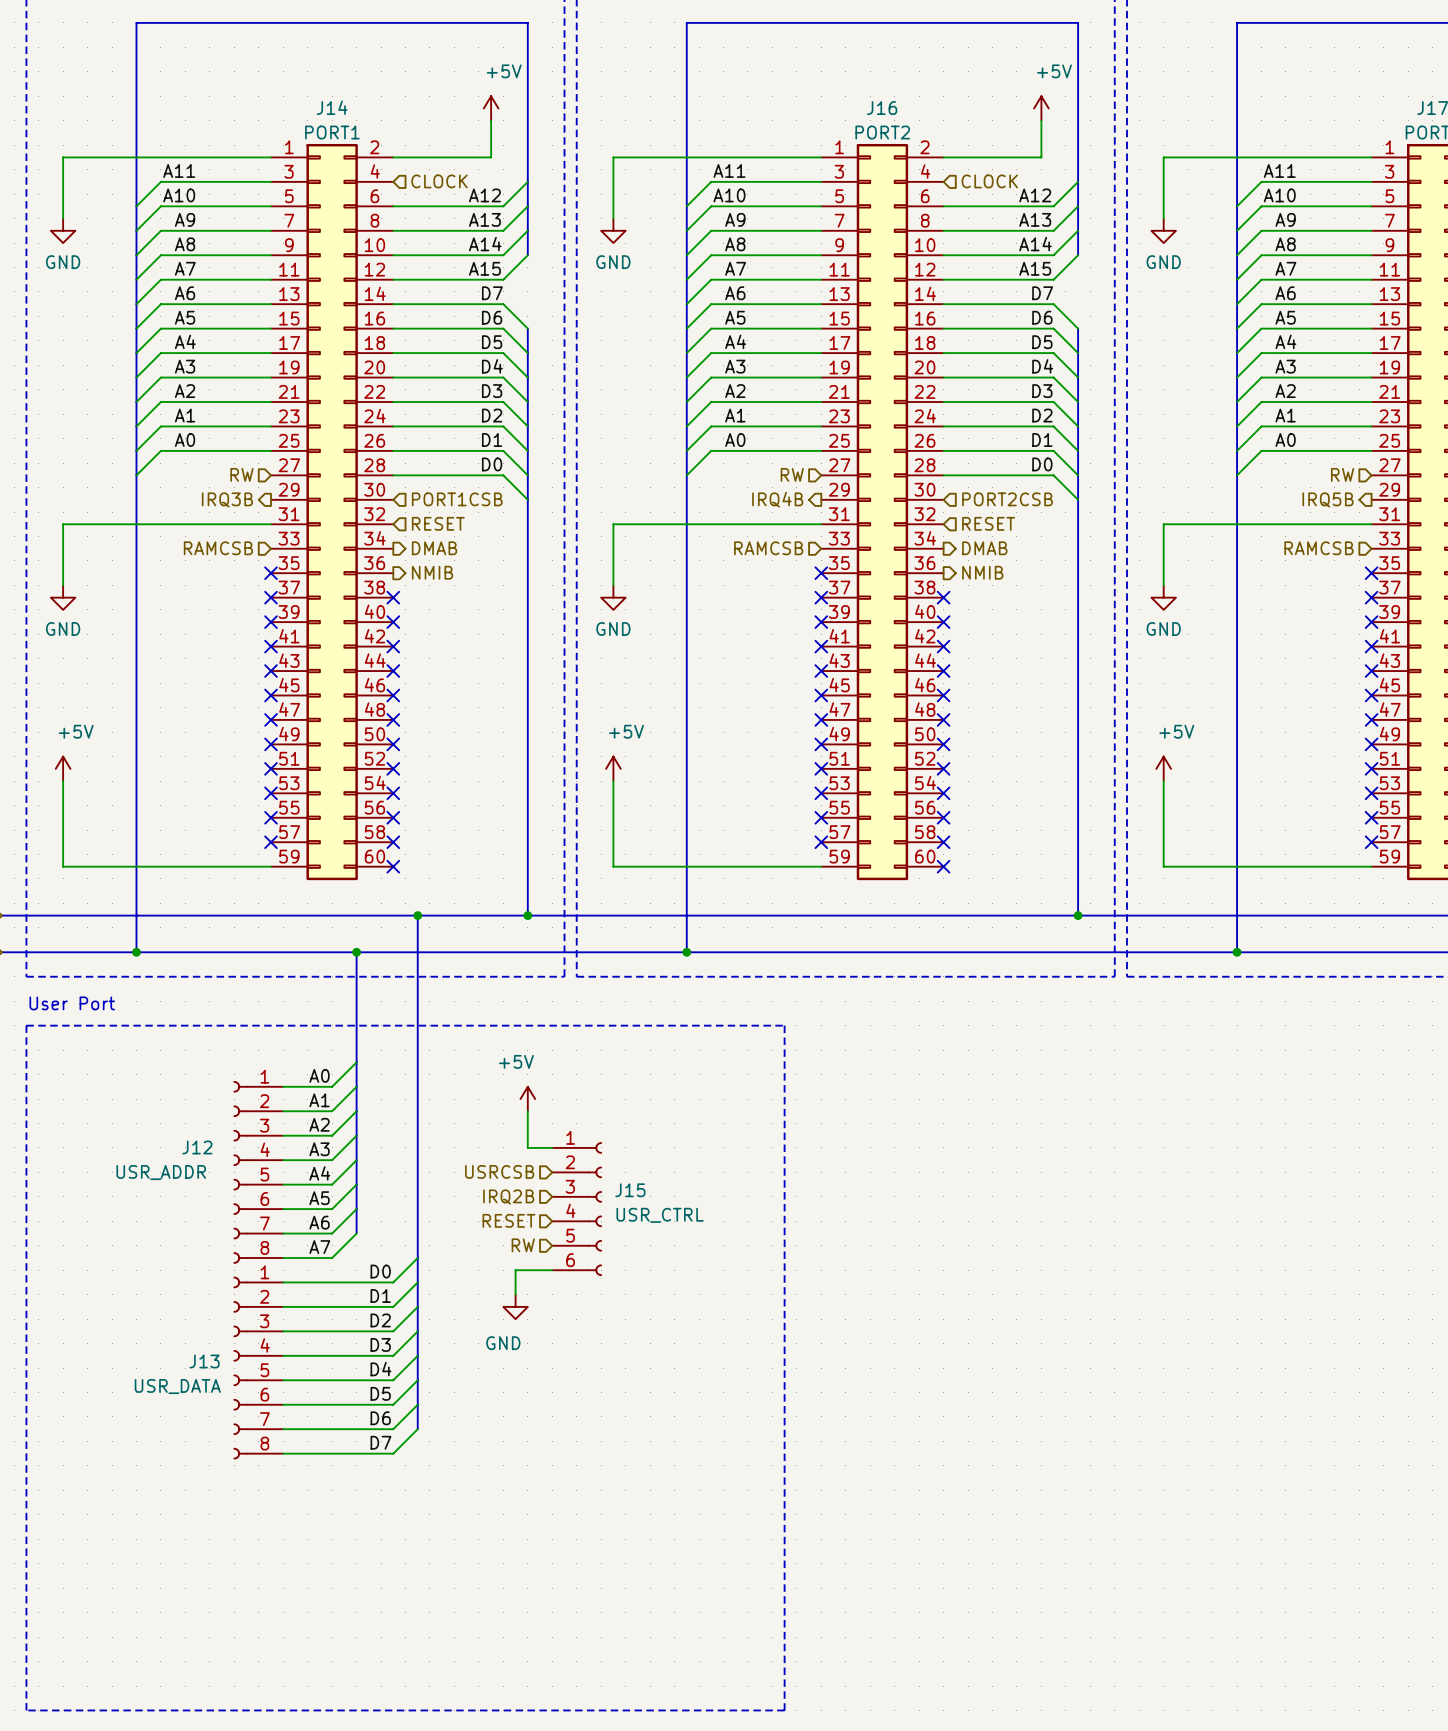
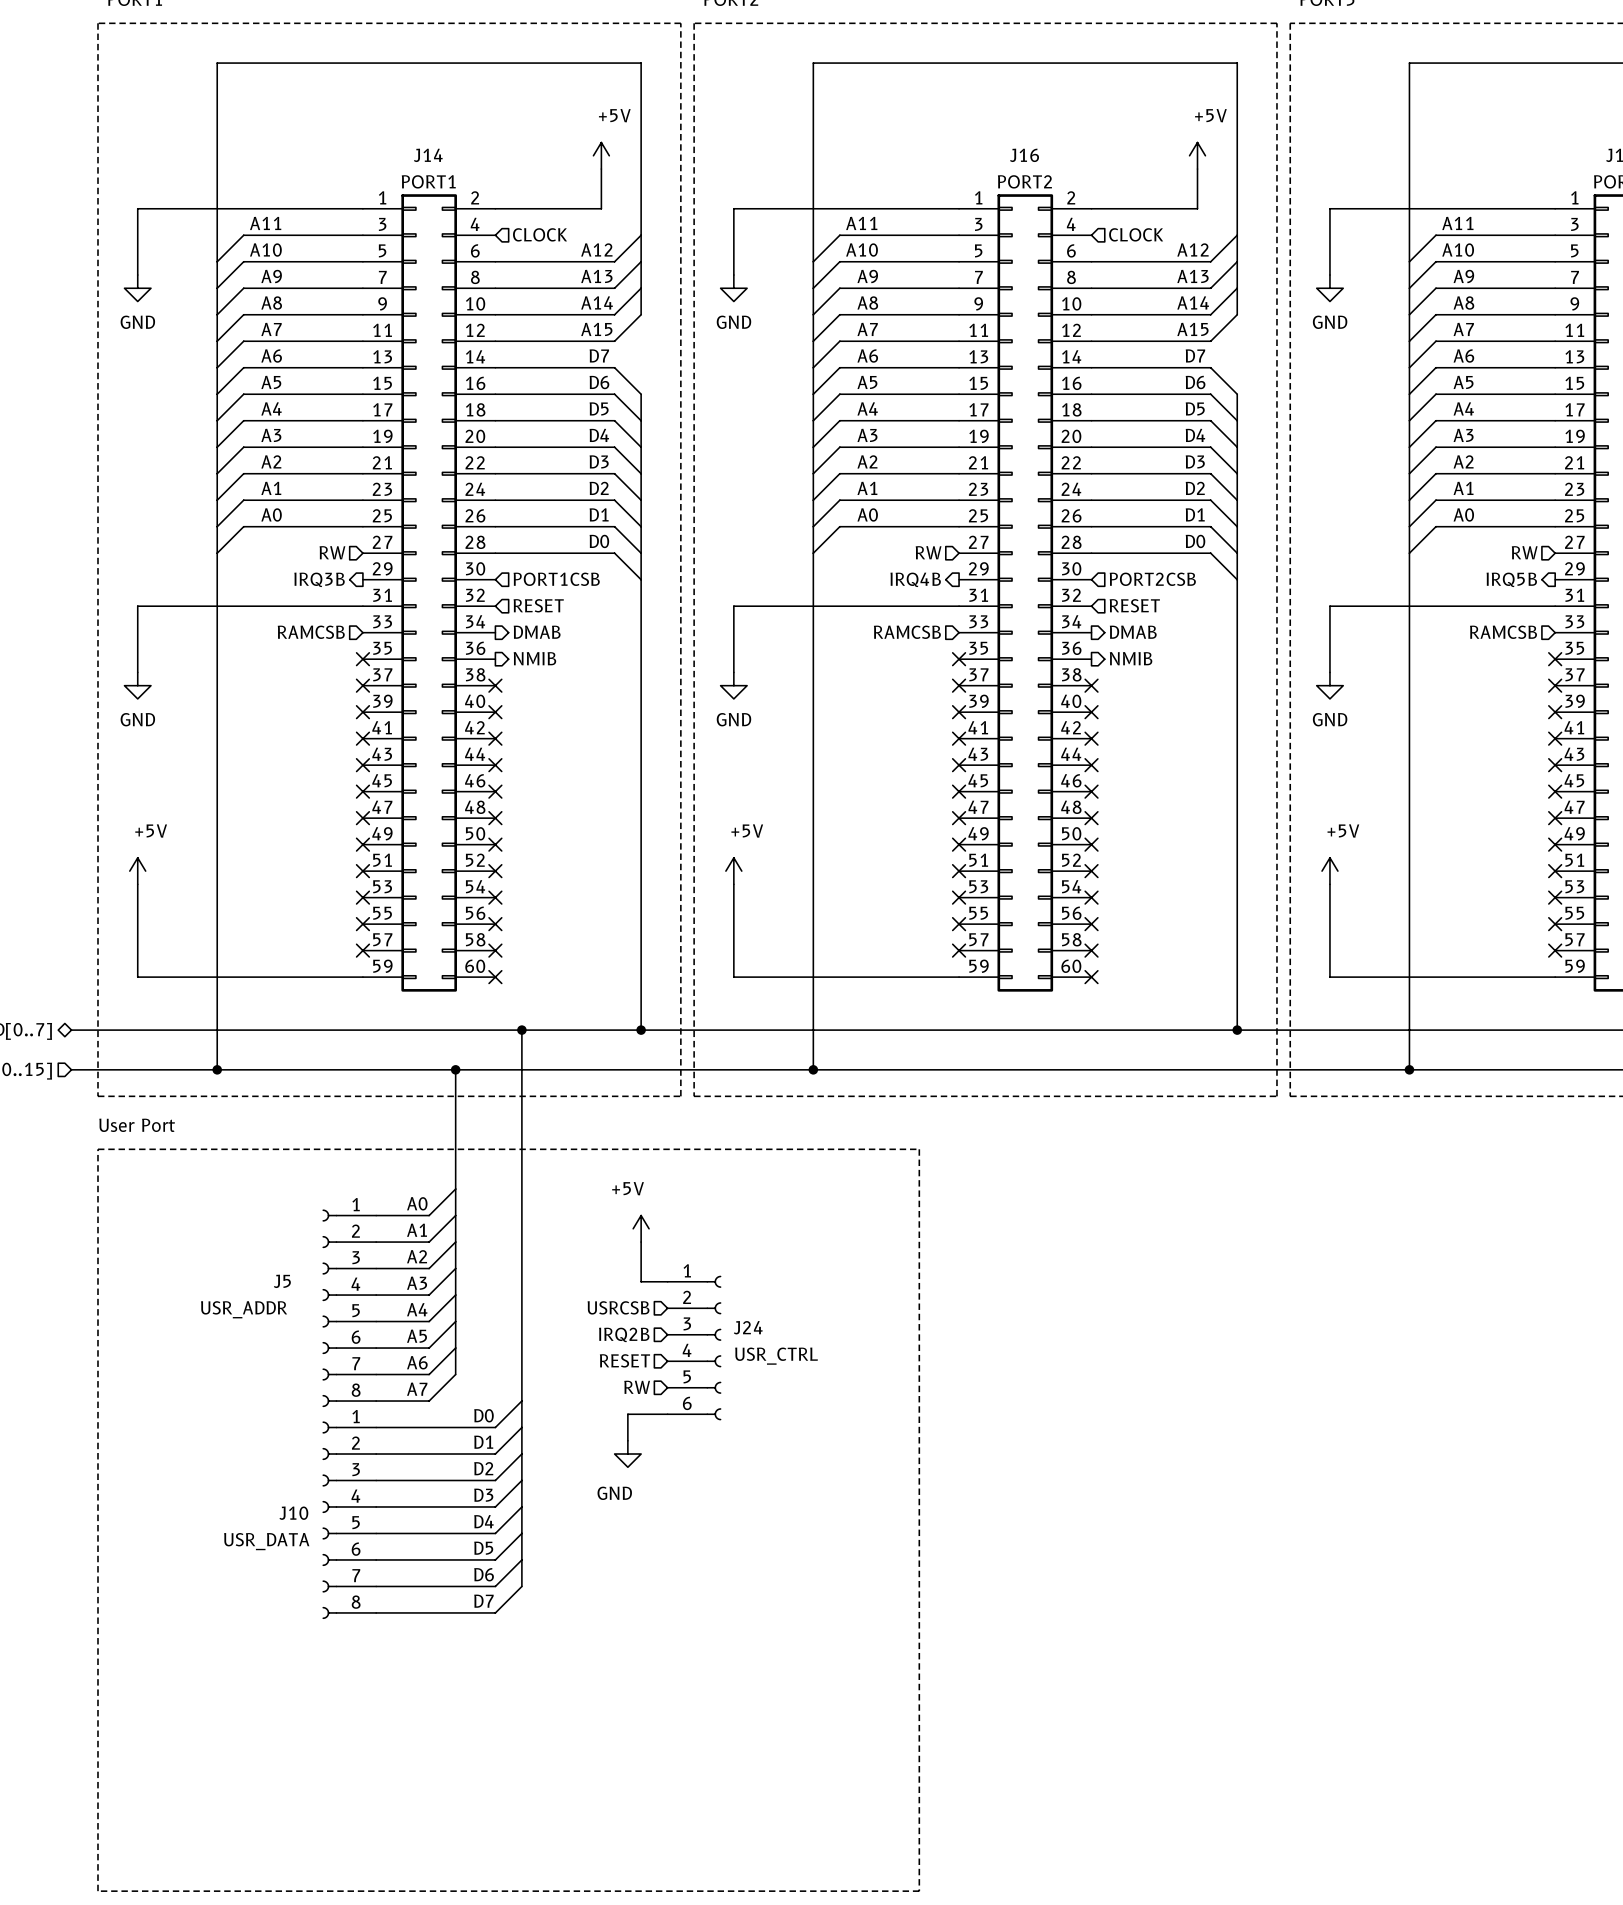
J12 name: J12 (197, 1147) -> J5 (282, 1281)
J15 name: J15 (630, 1190) -> J24 (748, 1327)
J13 name: J13 (204, 1361) -> J10 (293, 1513)

